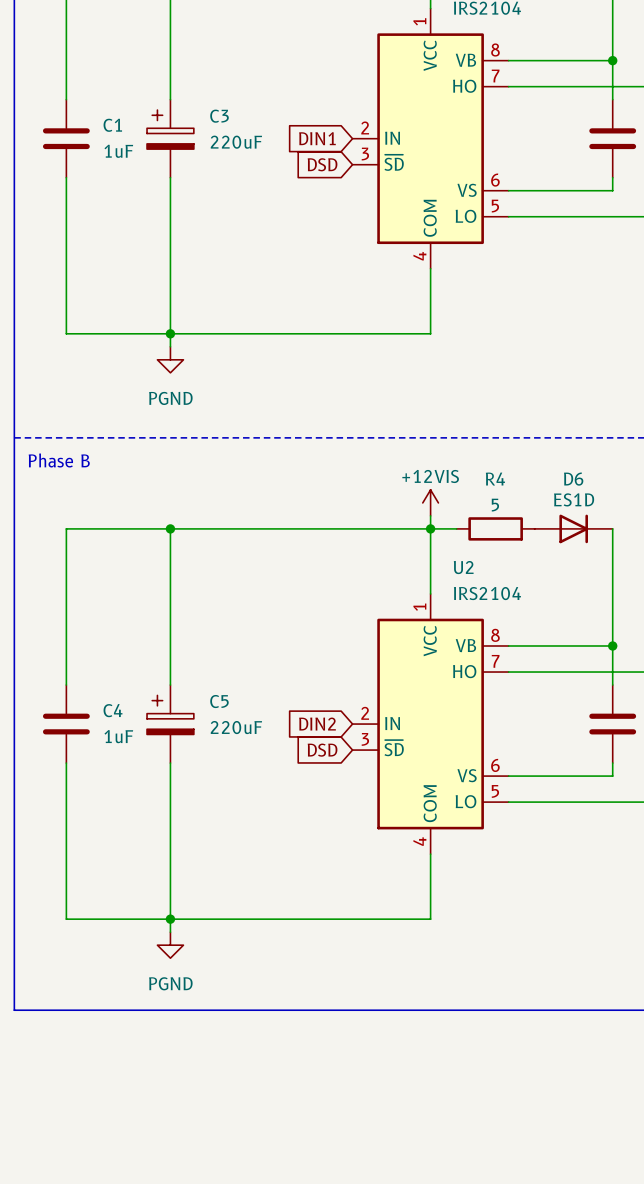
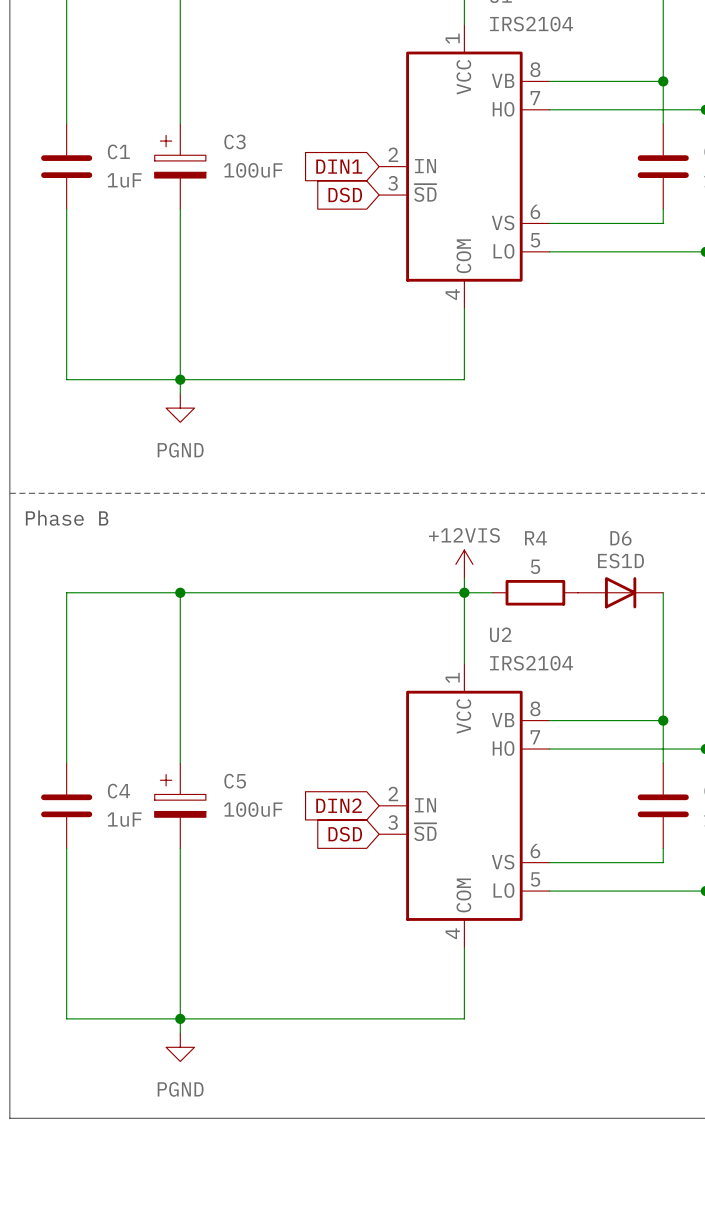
C3 value: 220uF (236, 142) -> 100uF (253, 170)
C5 value: 220uF (236, 727) -> 100uF (253, 809)

